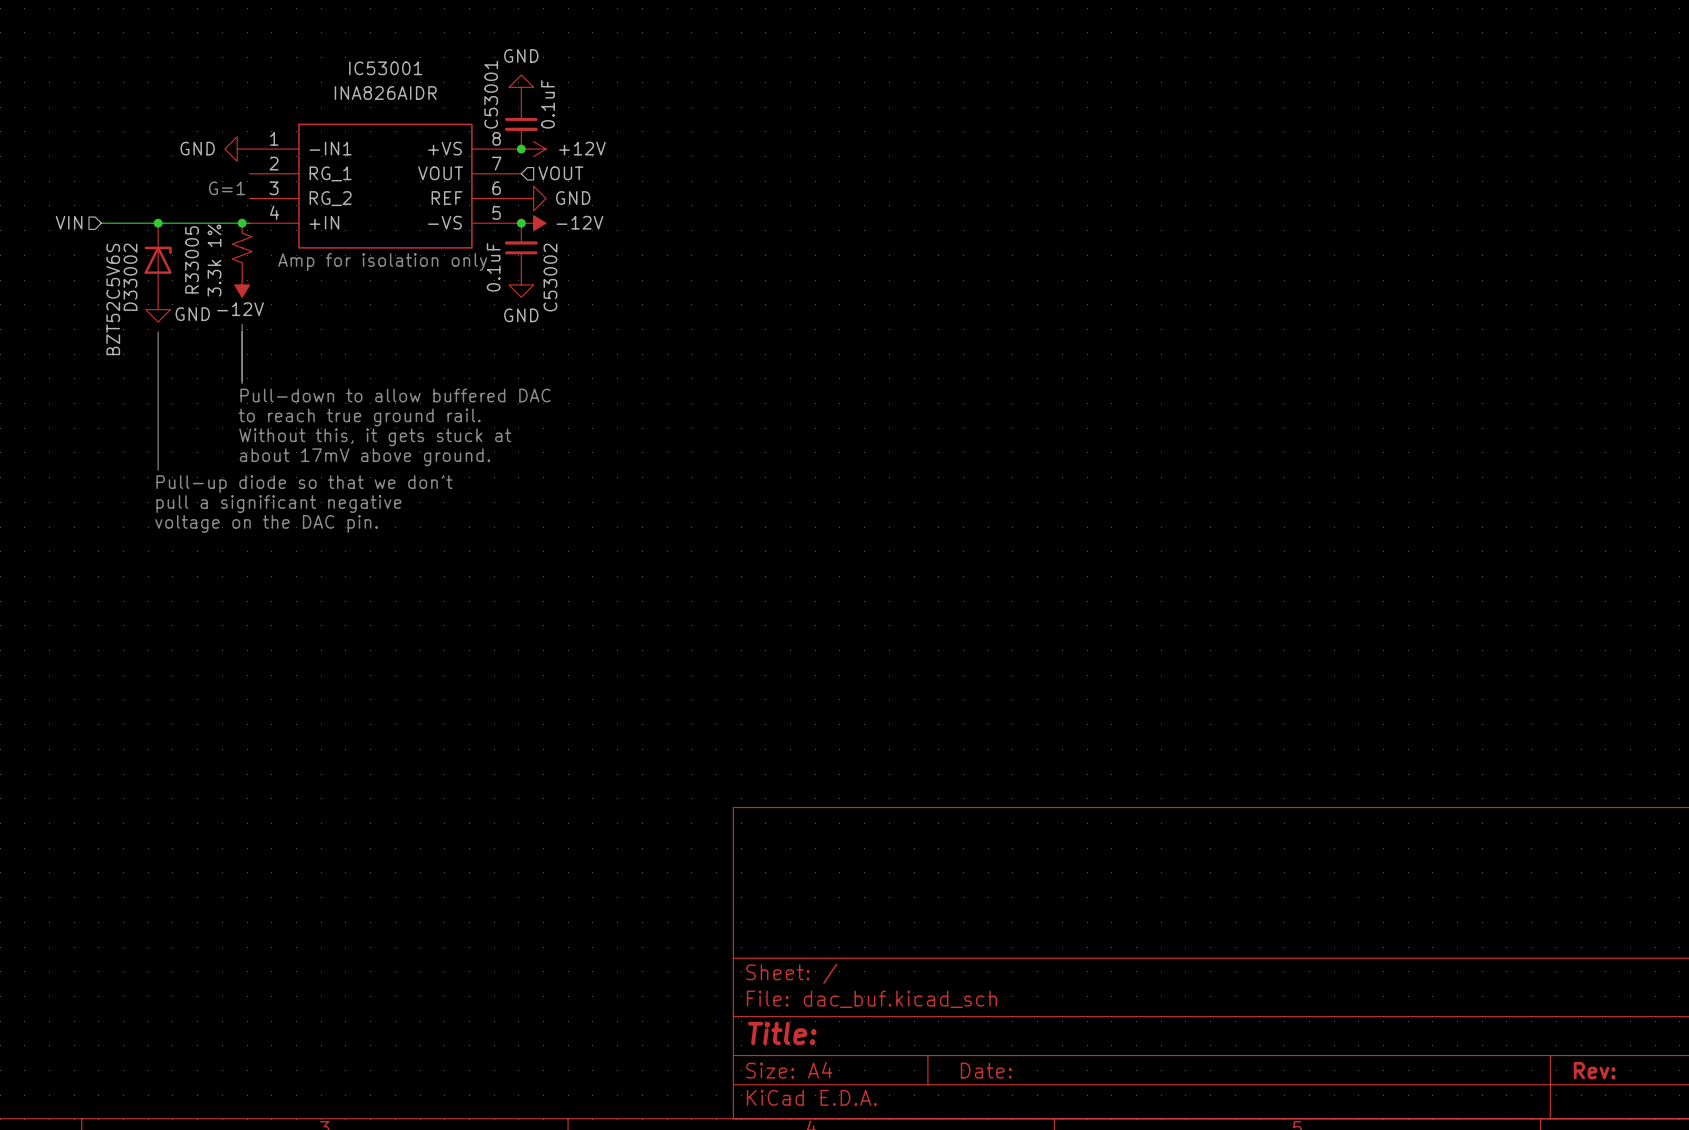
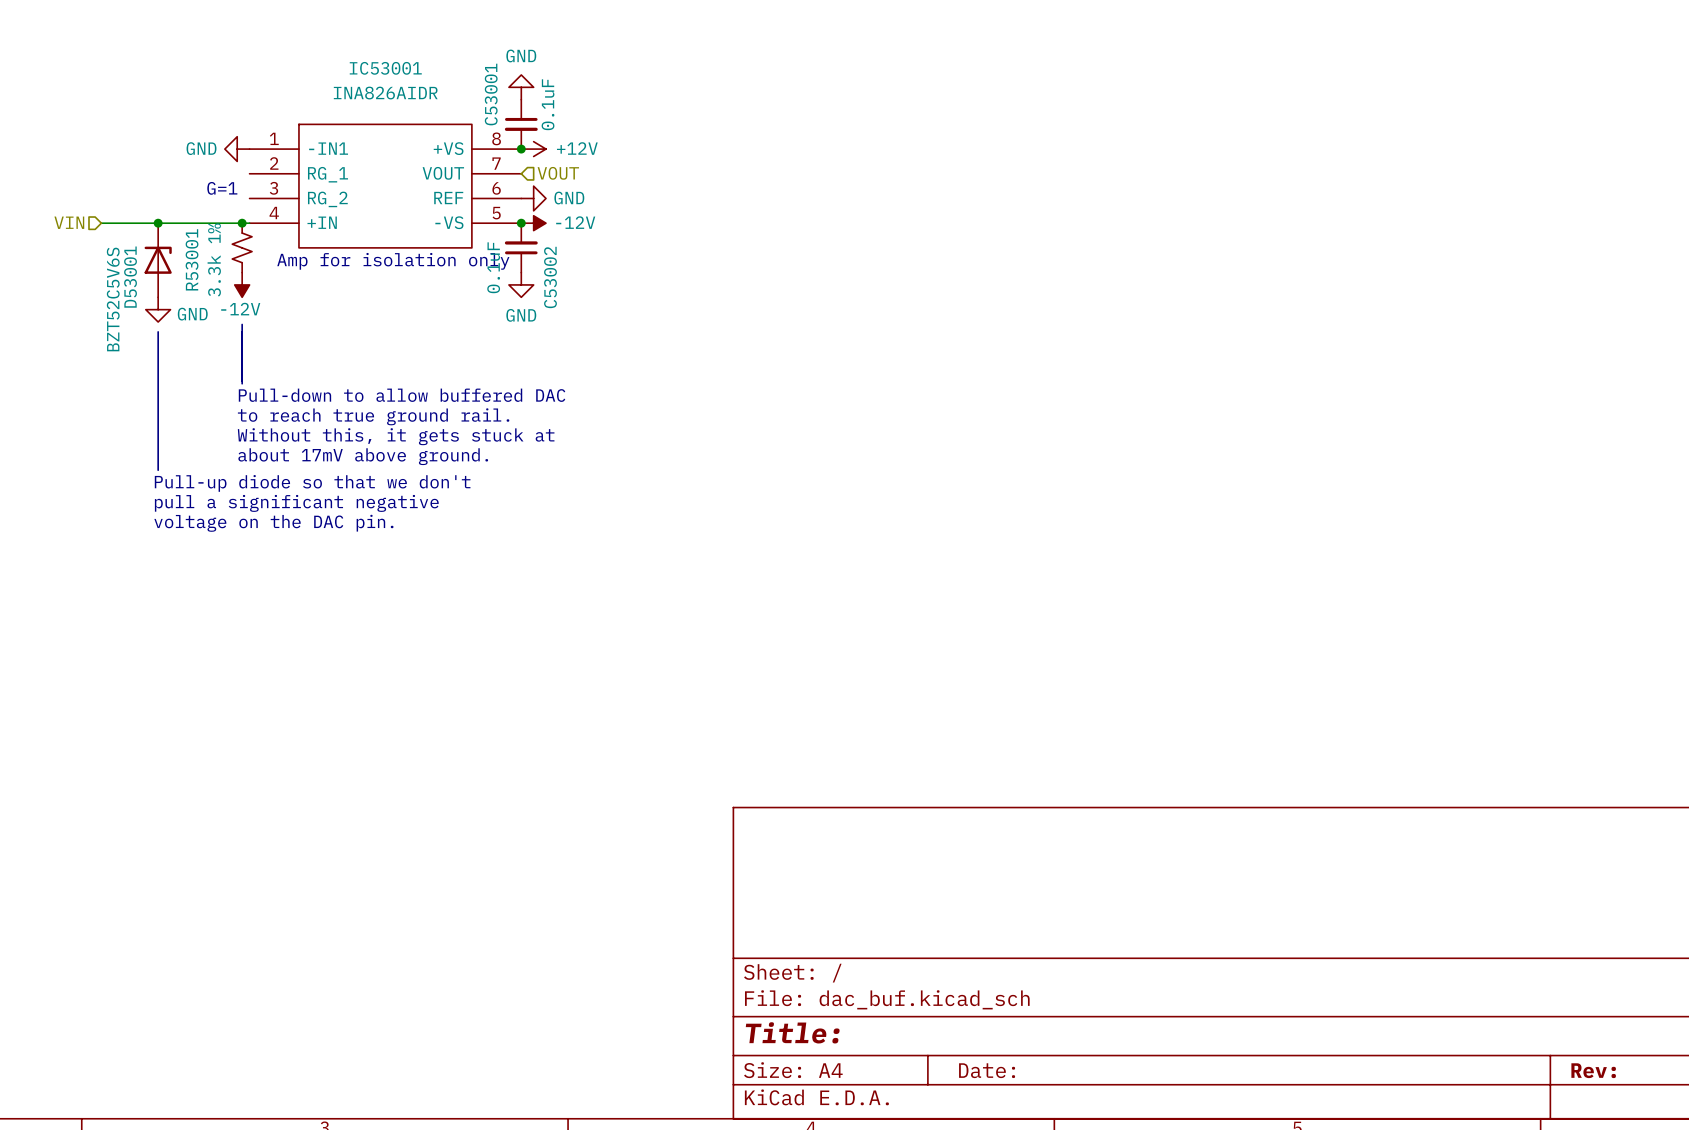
R33005 name: R33005 (192, 259) -> R53001 (192, 259)
D33002 name: D33002 (130, 277) -> D53001 (130, 277)

